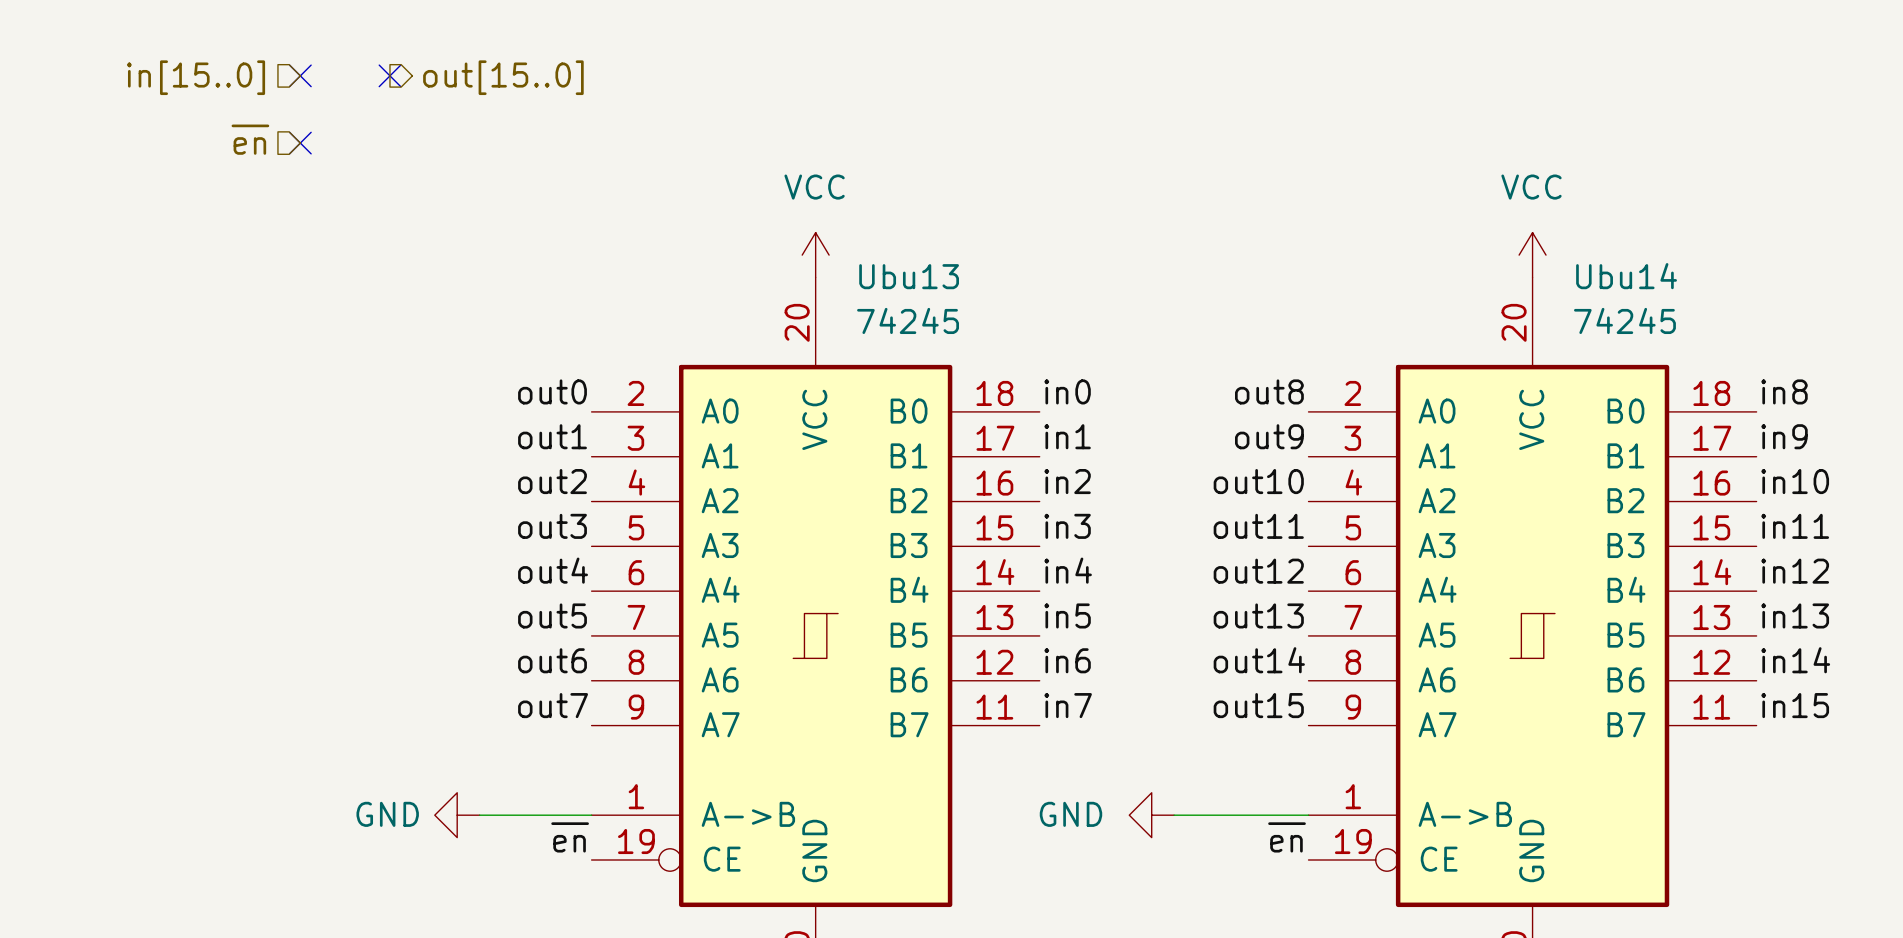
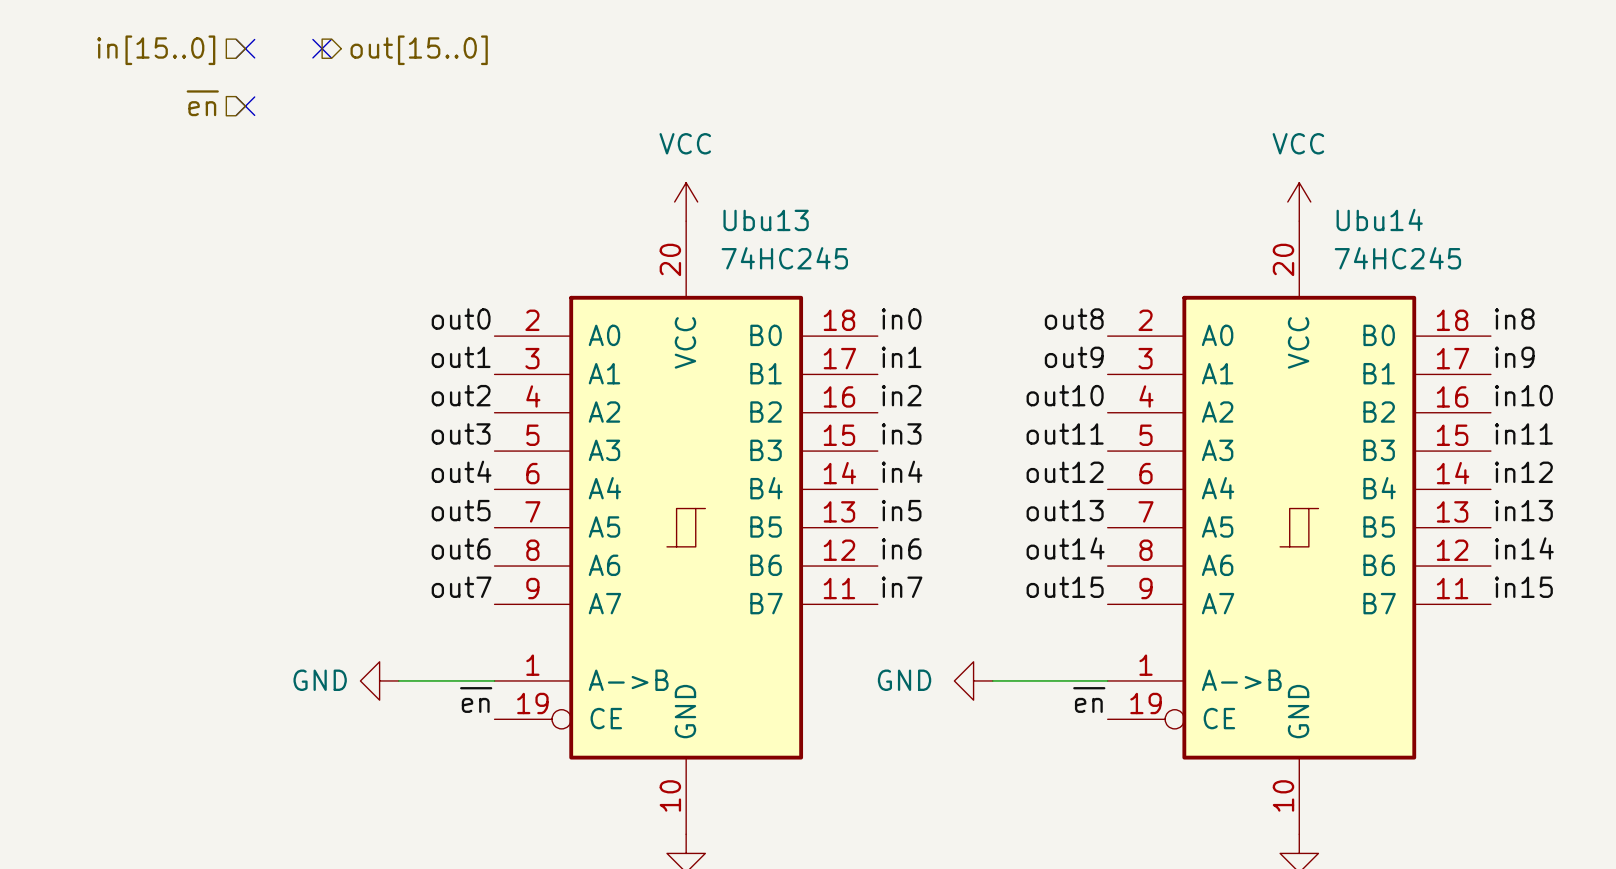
Ubu13 value: 74245 (908, 320) -> 74HC245 (784, 258)
Ubu14 value: 74245 (1624, 320) -> 74HC245 (1397, 258)

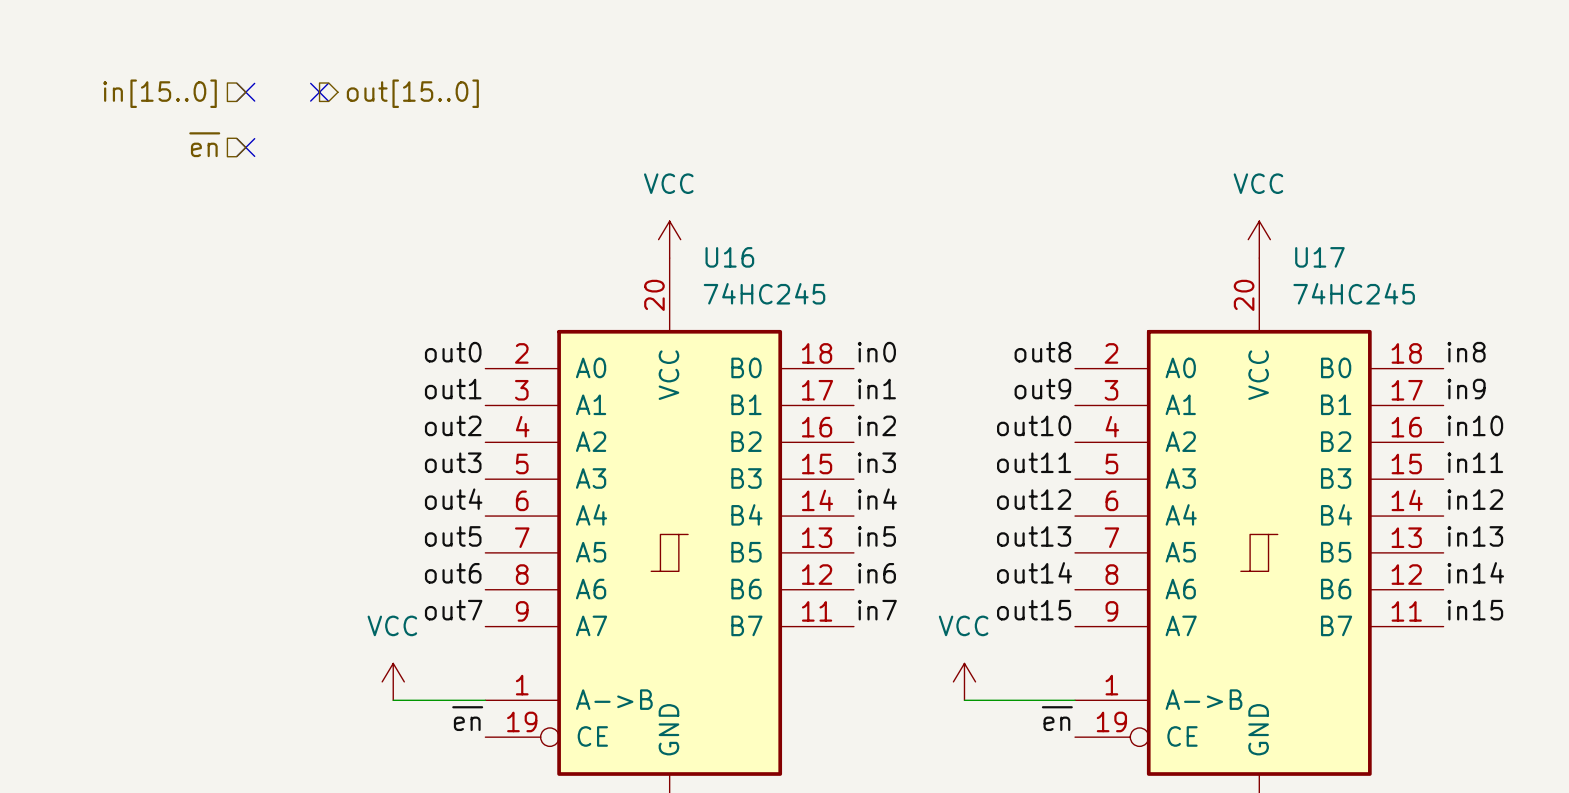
Ubu14 name: Ubu14 (1379, 219) -> U17 (1319, 257)
Ubu13 name: Ubu13 (766, 220) -> U16 (729, 257)
power symbol: none -> VCC (393, 681)
power symbol: none -> VCC (964, 681)
power symbol: GND (379, 680) -> none
power symbol: GND (973, 680) -> none

